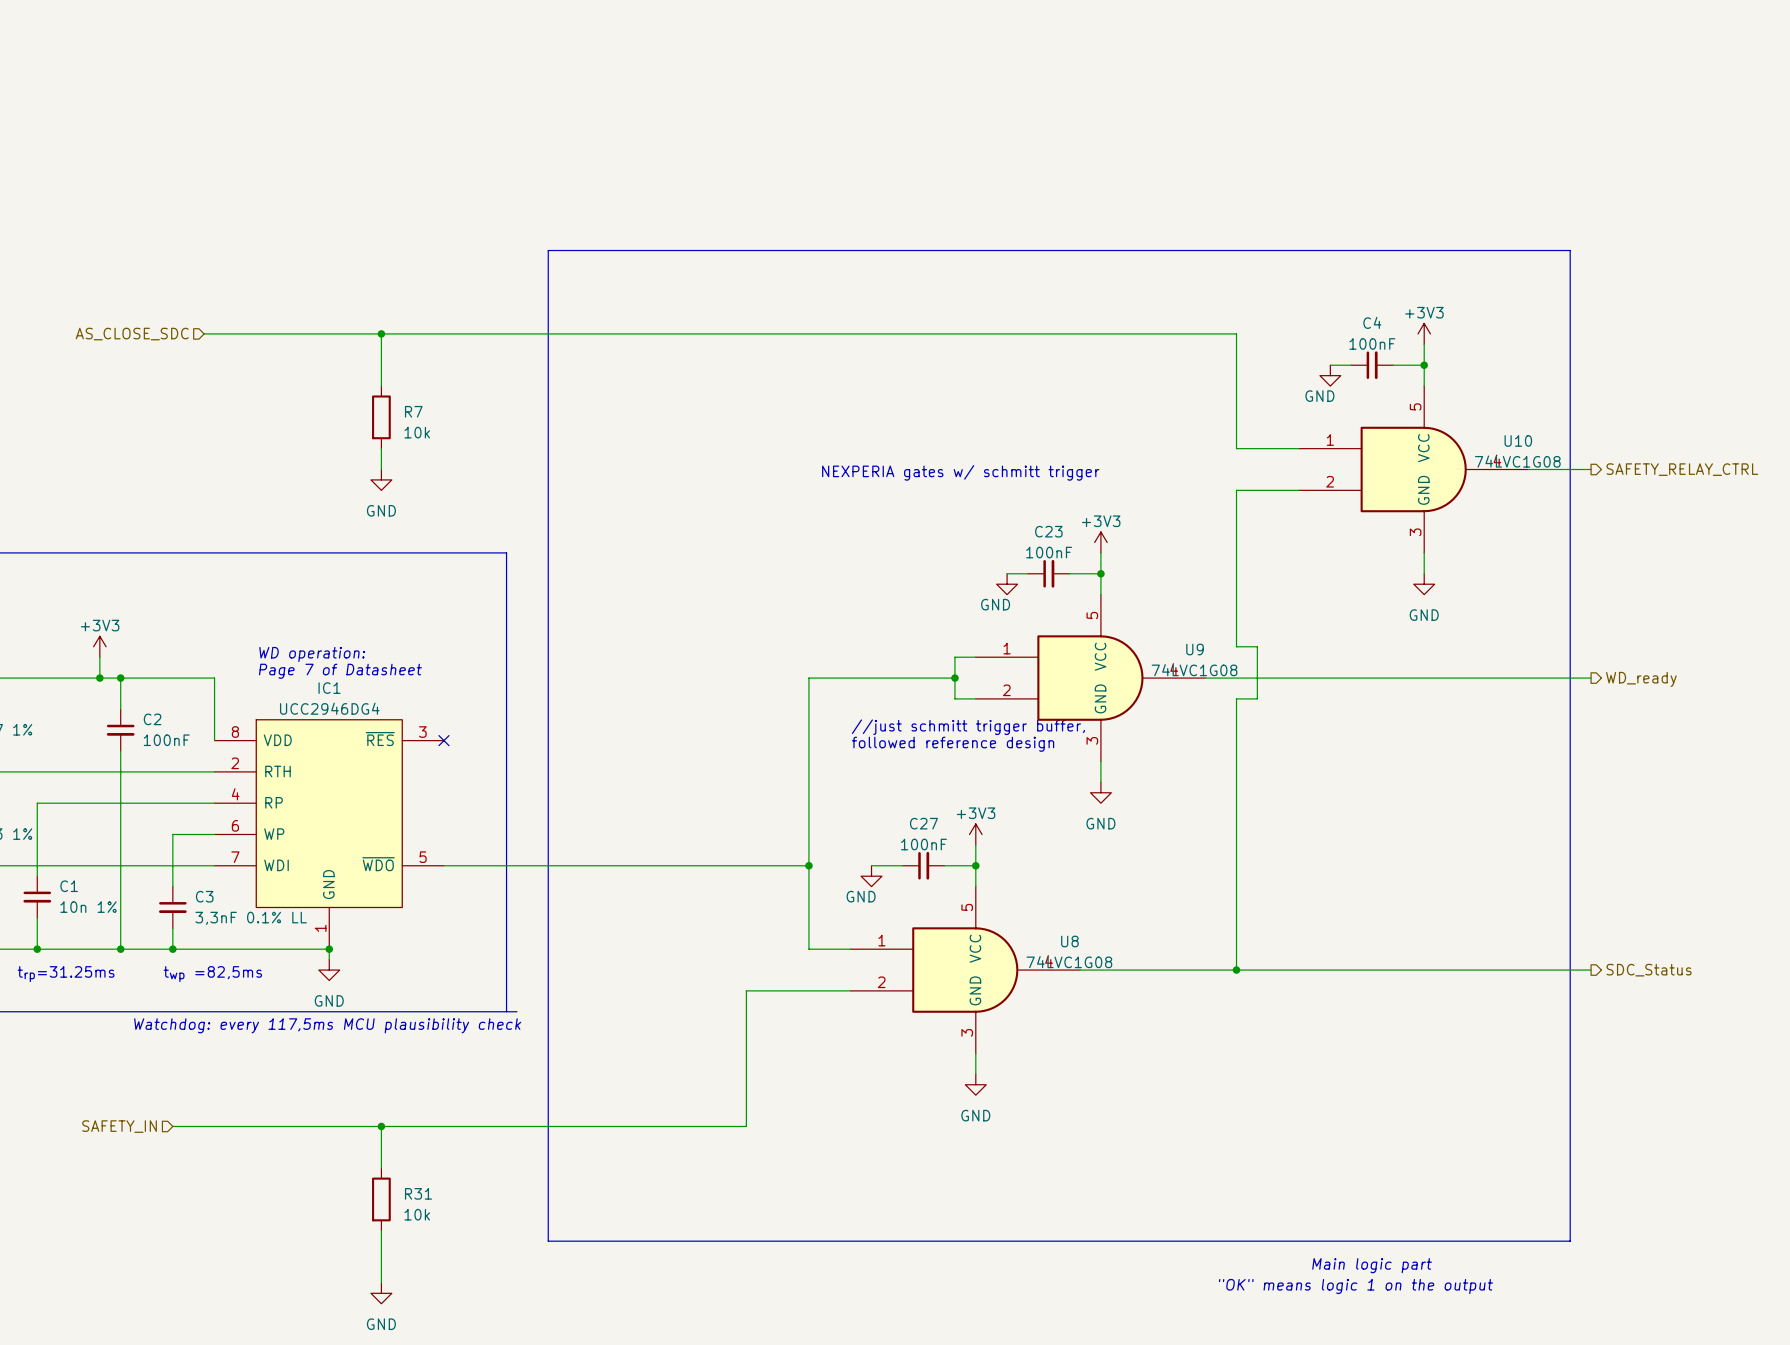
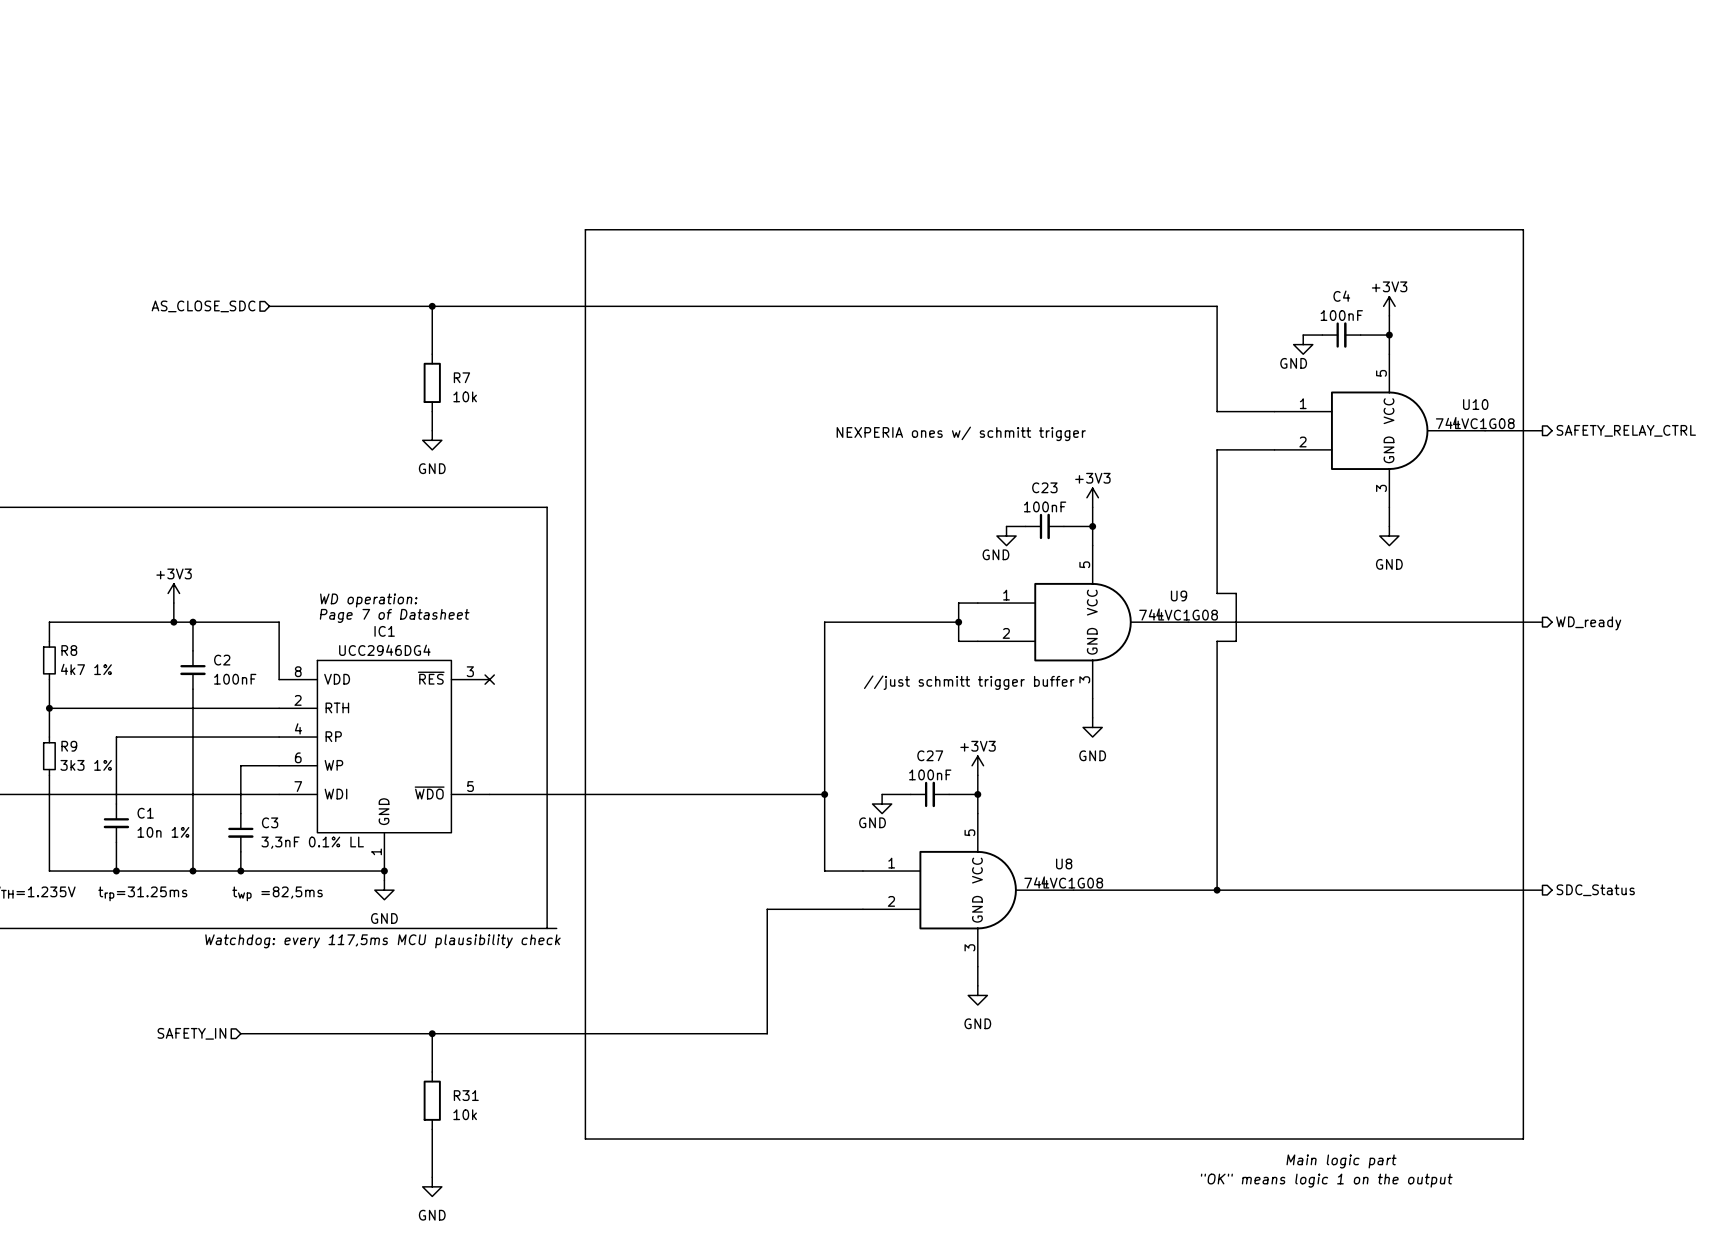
text: NEXPERIA gates w/ schmitt trigger (960, 472) -> NEXPERIA ones w/ schmitt trigger (961, 433)
text: //just schmitt trigger buffer, (968, 727) -> none
text: followed reference design (953, 744) -> //just schmitt trigger buffer (969, 682)

